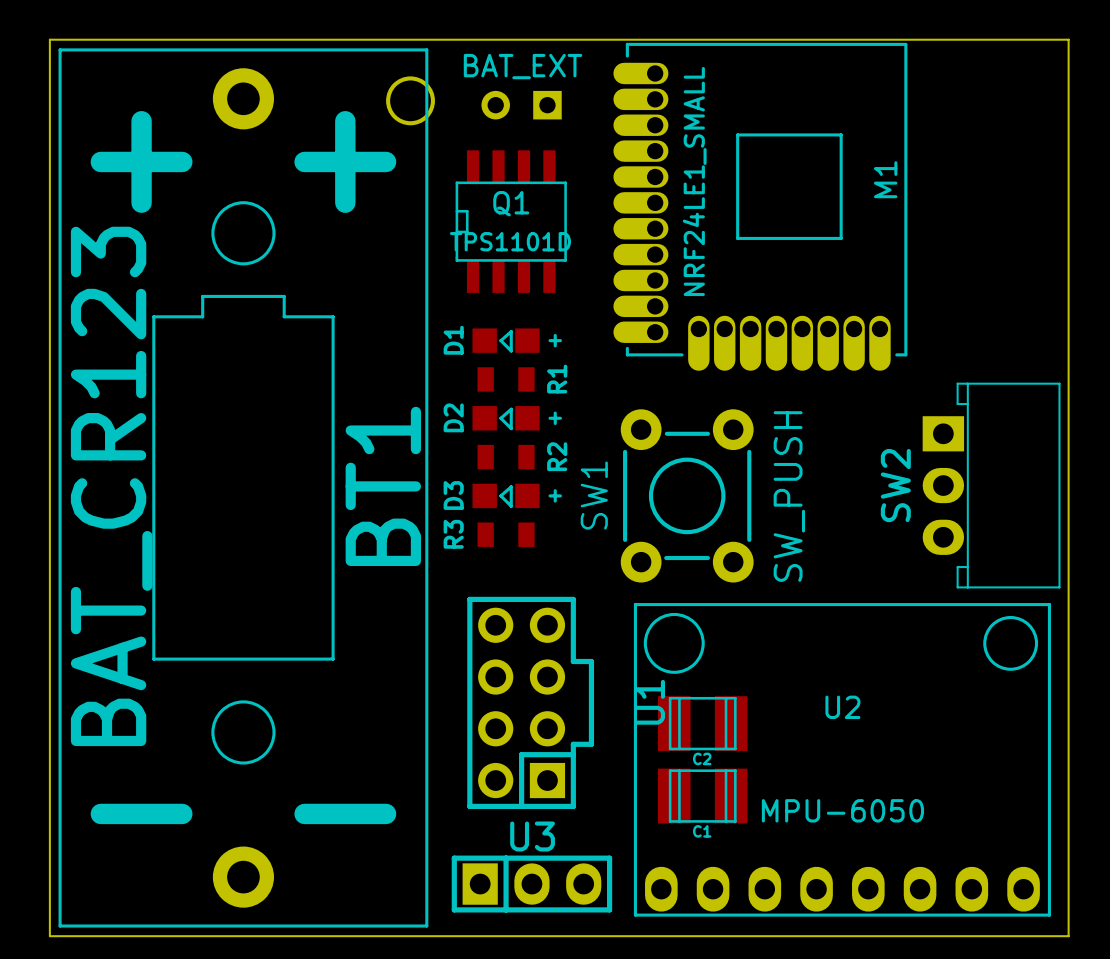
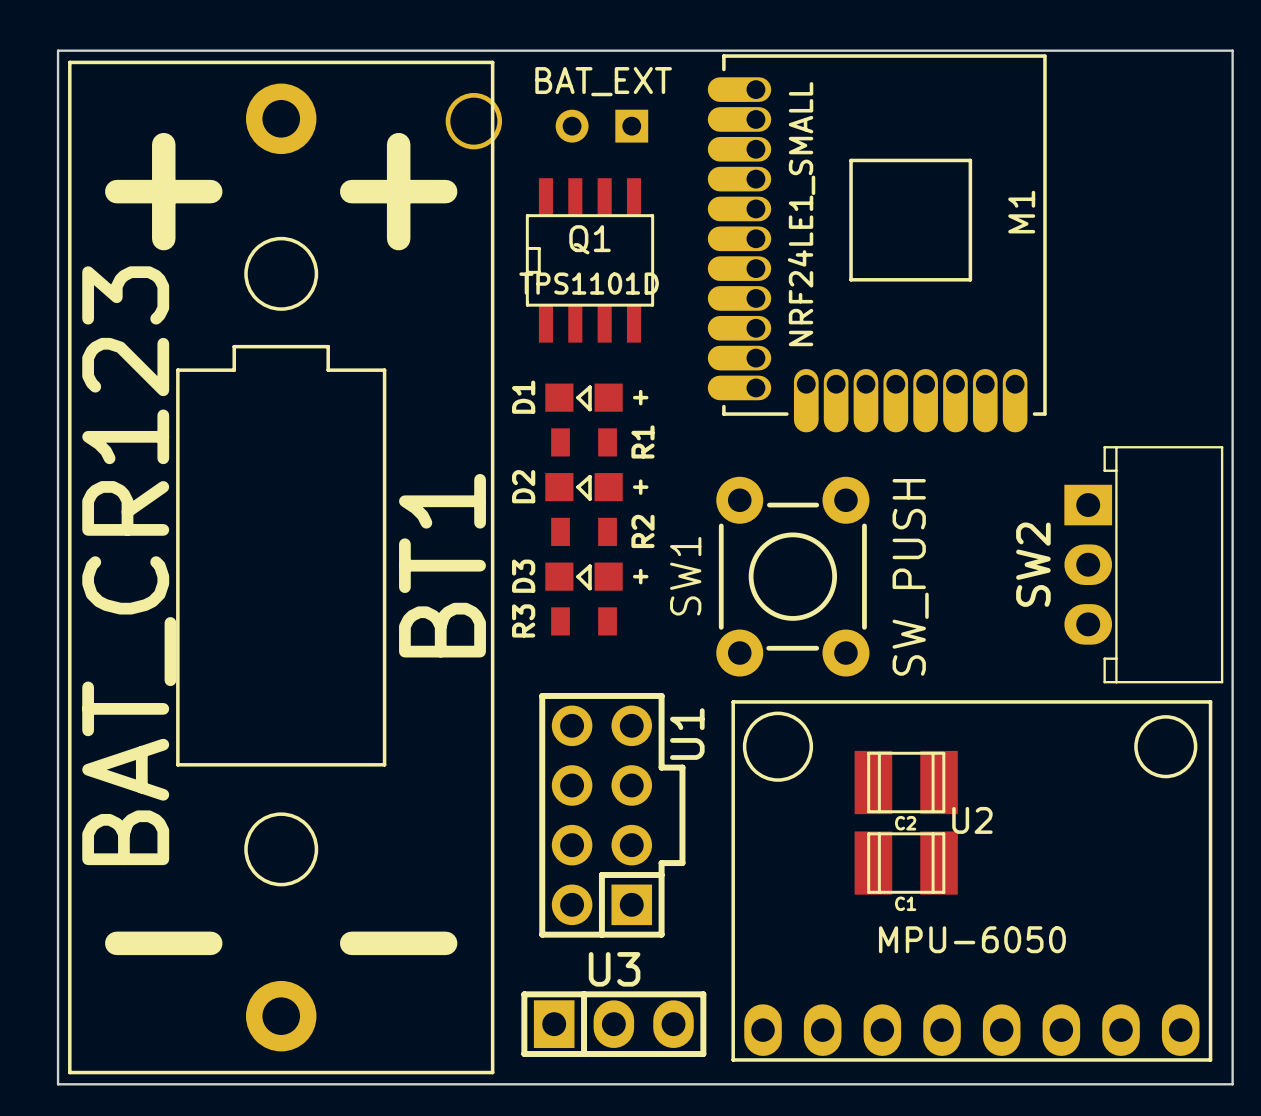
U1 name position: U1 (650, 702) -> U1 (687, 734)
C2 position: (702, 723) -> (906, 782)
C1 position: (702, 796) -> (906, 863)

